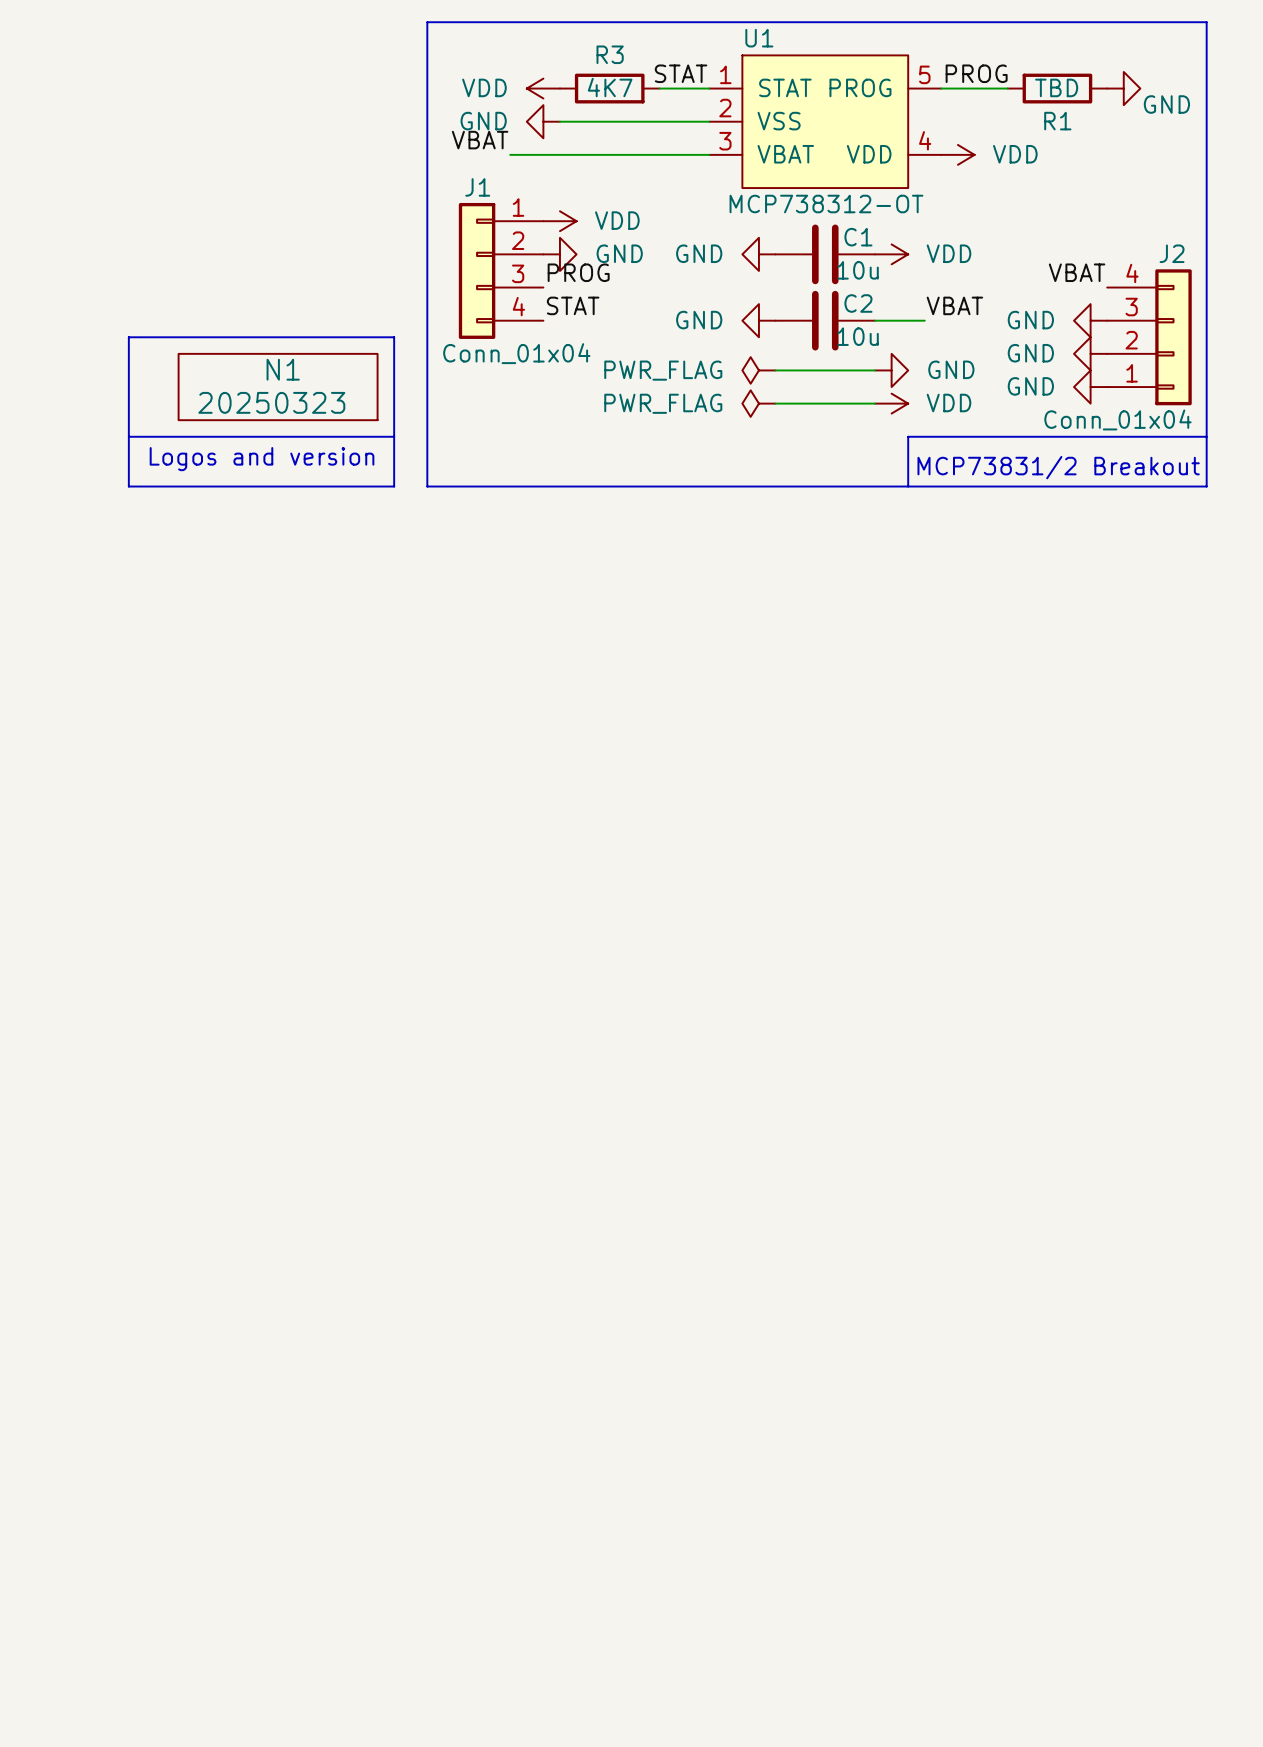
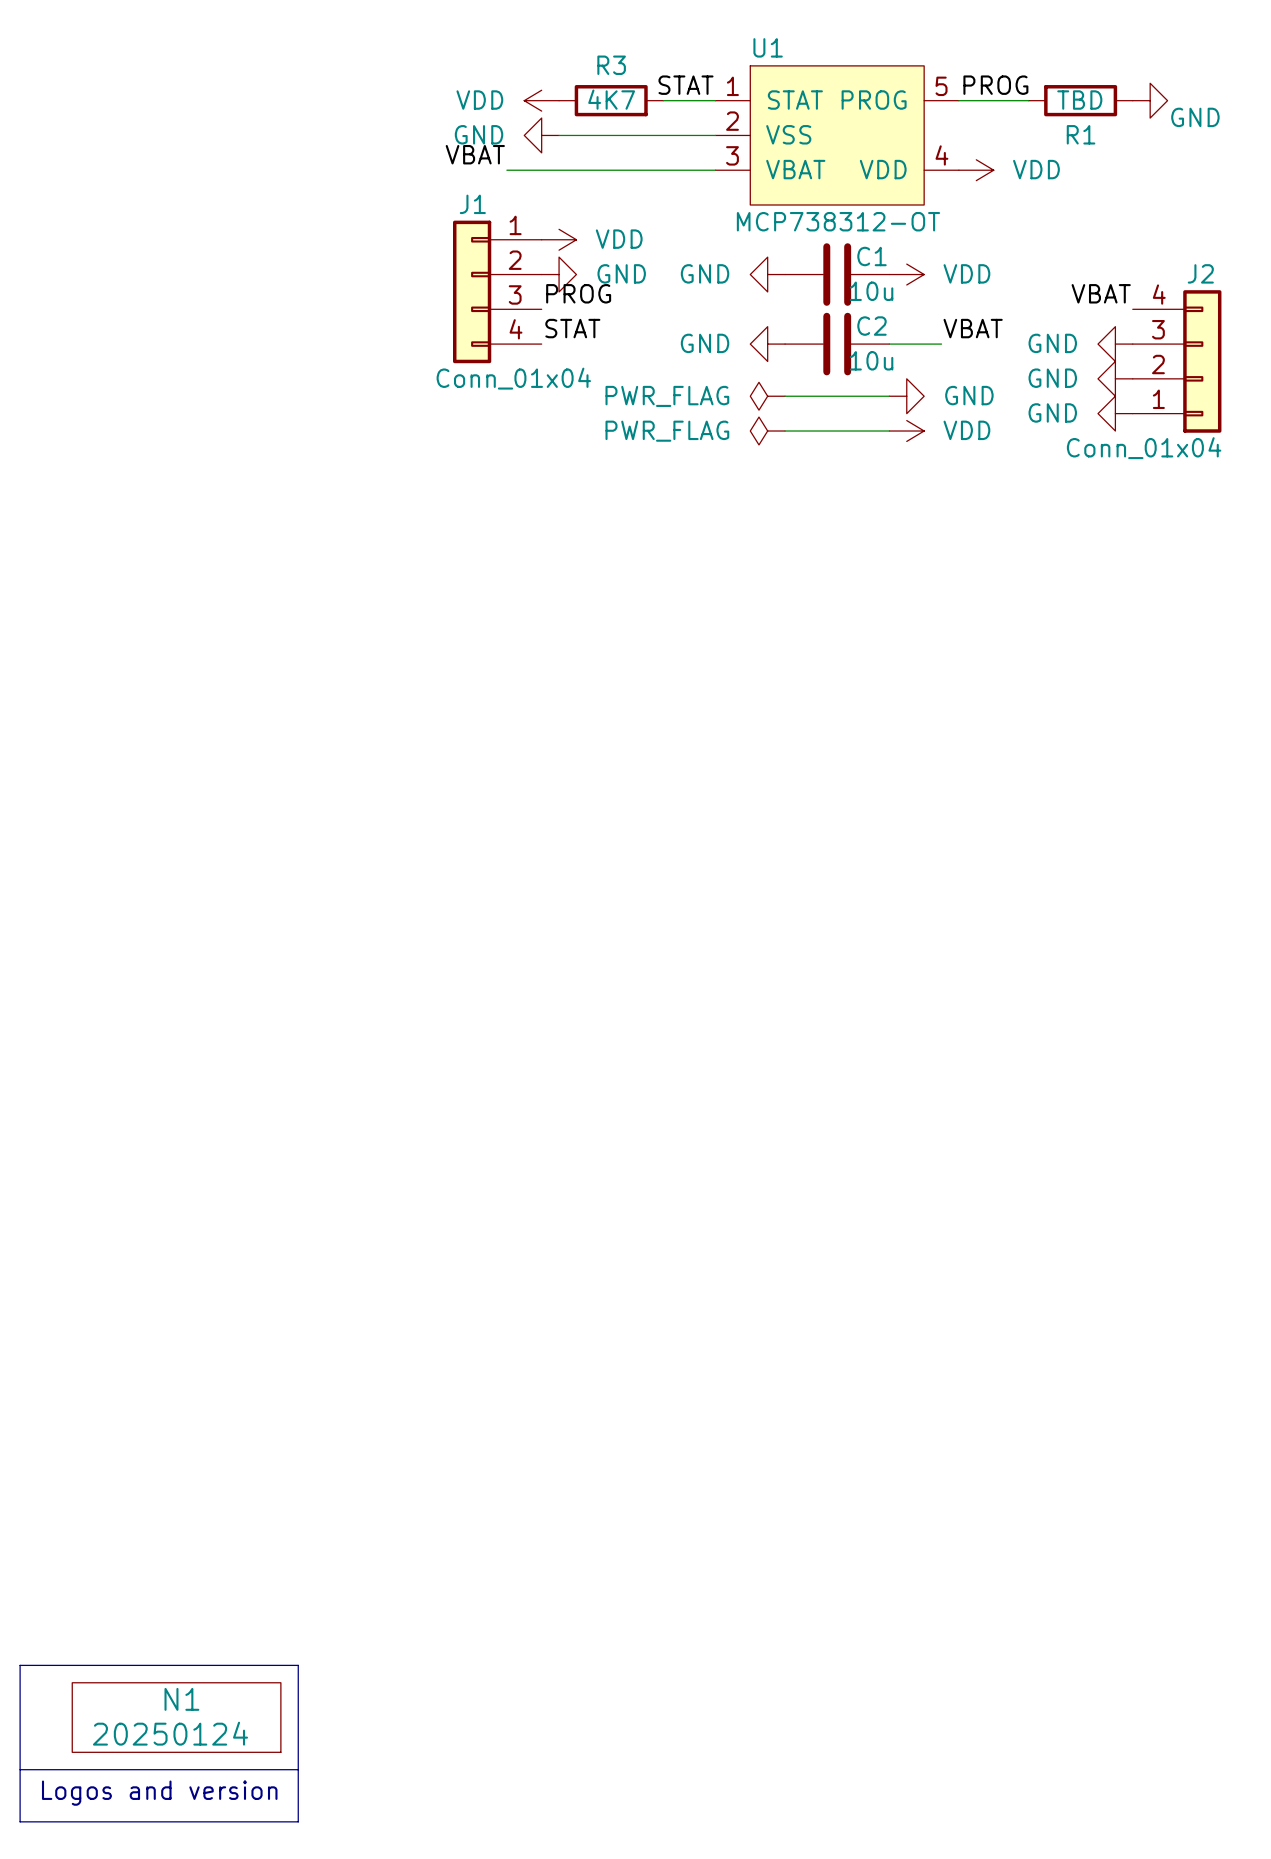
line: (427, 22) (1206, 22) (1206, 486) (427, 486) (427, 22) -> none
line: (128, 337) (128, 486) (394, 486) (394, 337) (128, 337) -> none
N1 position: (278, 387) -> (176, 1717)
N1 value: 20250323 (271, 402) -> 20250124 (170, 1733)
line: (128, 436) (394, 436) -> none
line: (1206, 436) (908, 436) (908, 486) -> none
text: Logos and version (262, 459) -> none
text: MCP73831/2 Breakout (1058, 467) -> none
line: none -> (20, 1665) (20, 1821) (298, 1821) (298, 1665) (20, 1665)
line: none -> (20, 1769) (298, 1769)
text: none -> Logos and version (159, 1793)

